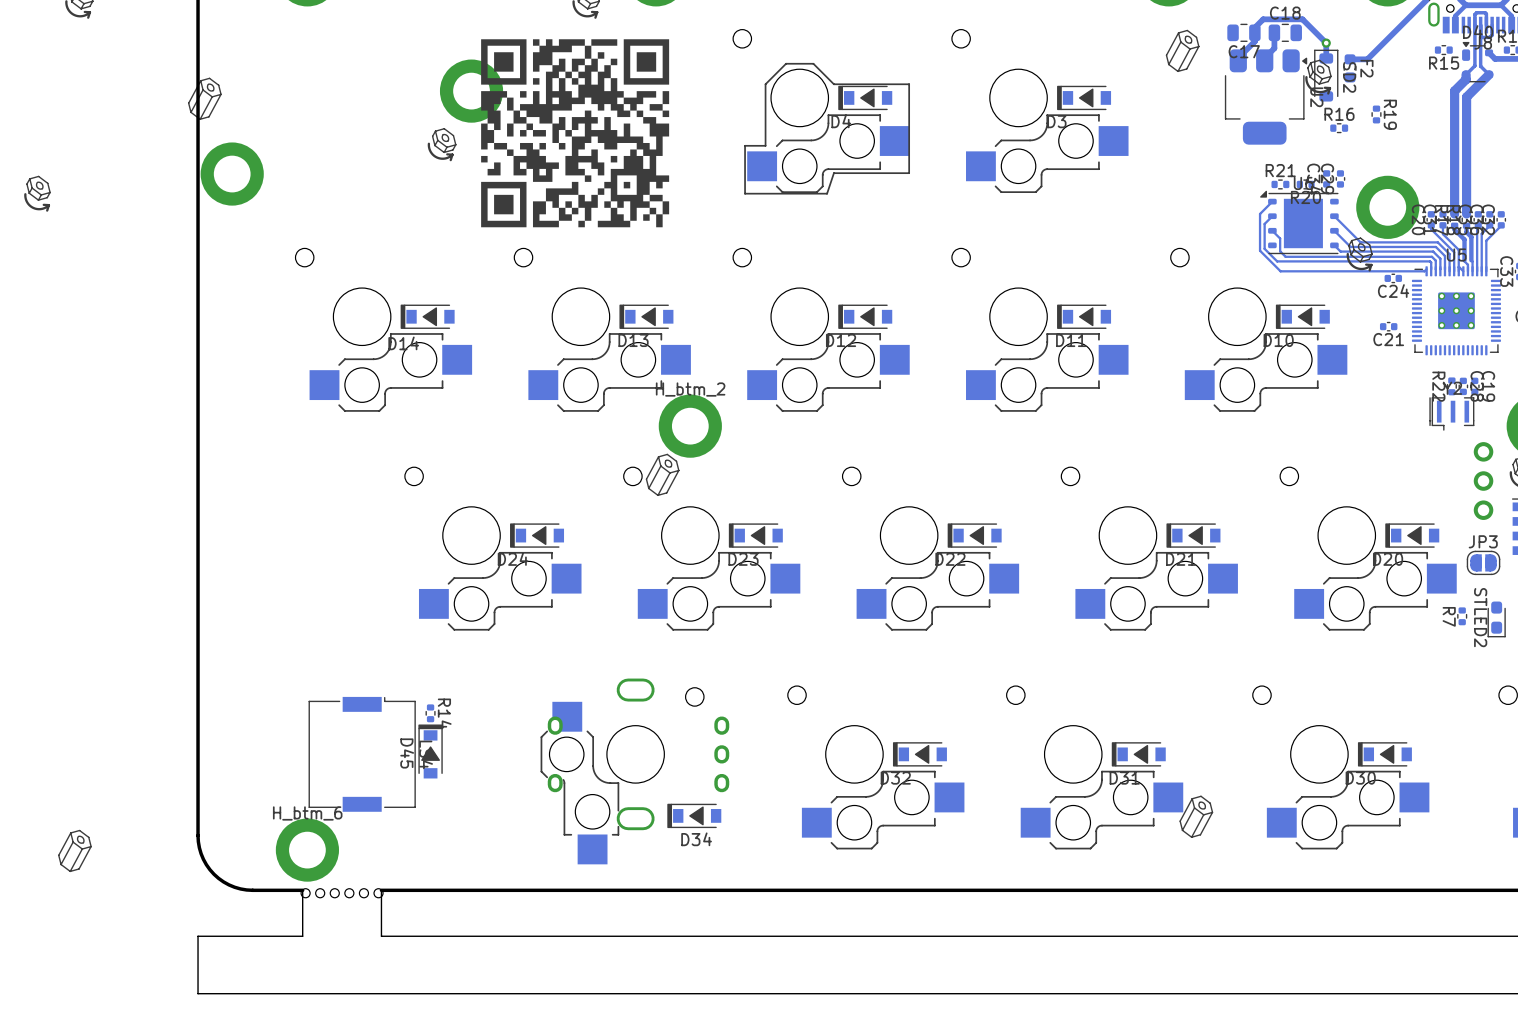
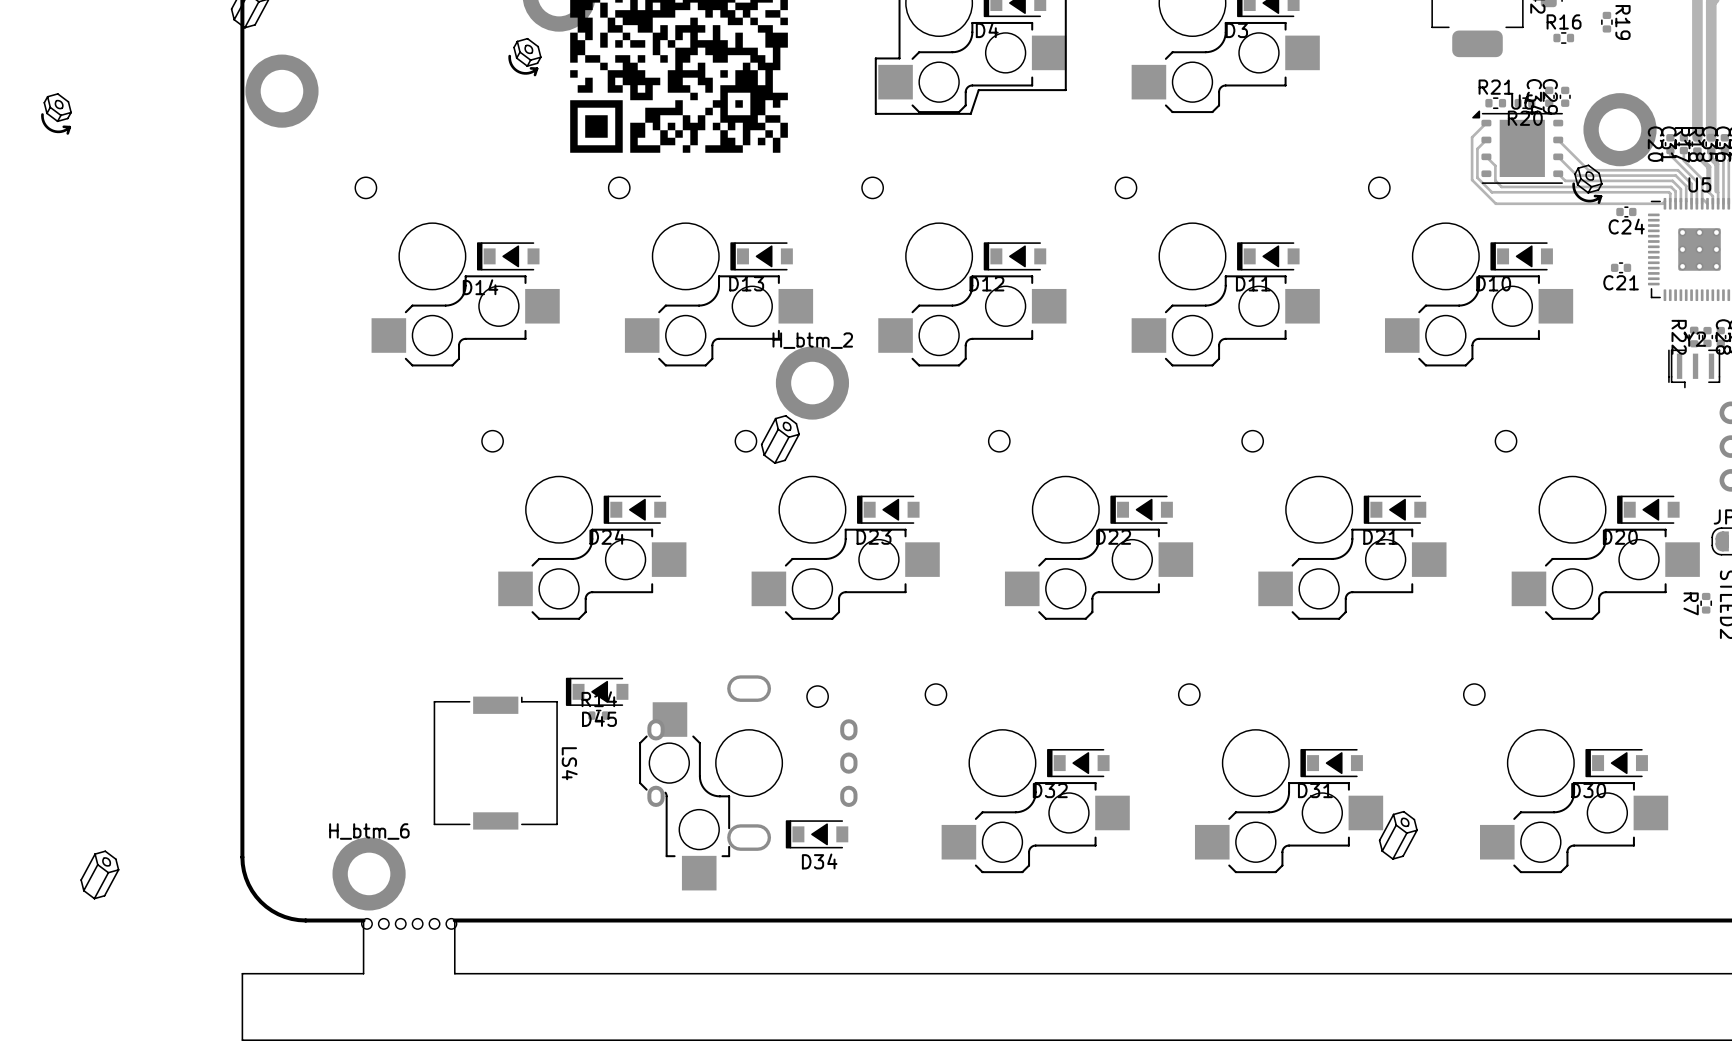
R14 rotation: 0° (430, 713) -> 90° clockwise (598, 715)
R14 position: (430, 713) -> (598, 715)
D45 rotation: 0° (430, 751) -> 90° counterclockwise (597, 691)
D45 position: (430, 751) -> (597, 691)
LS4 position: (362, 754) -> (495, 763)

